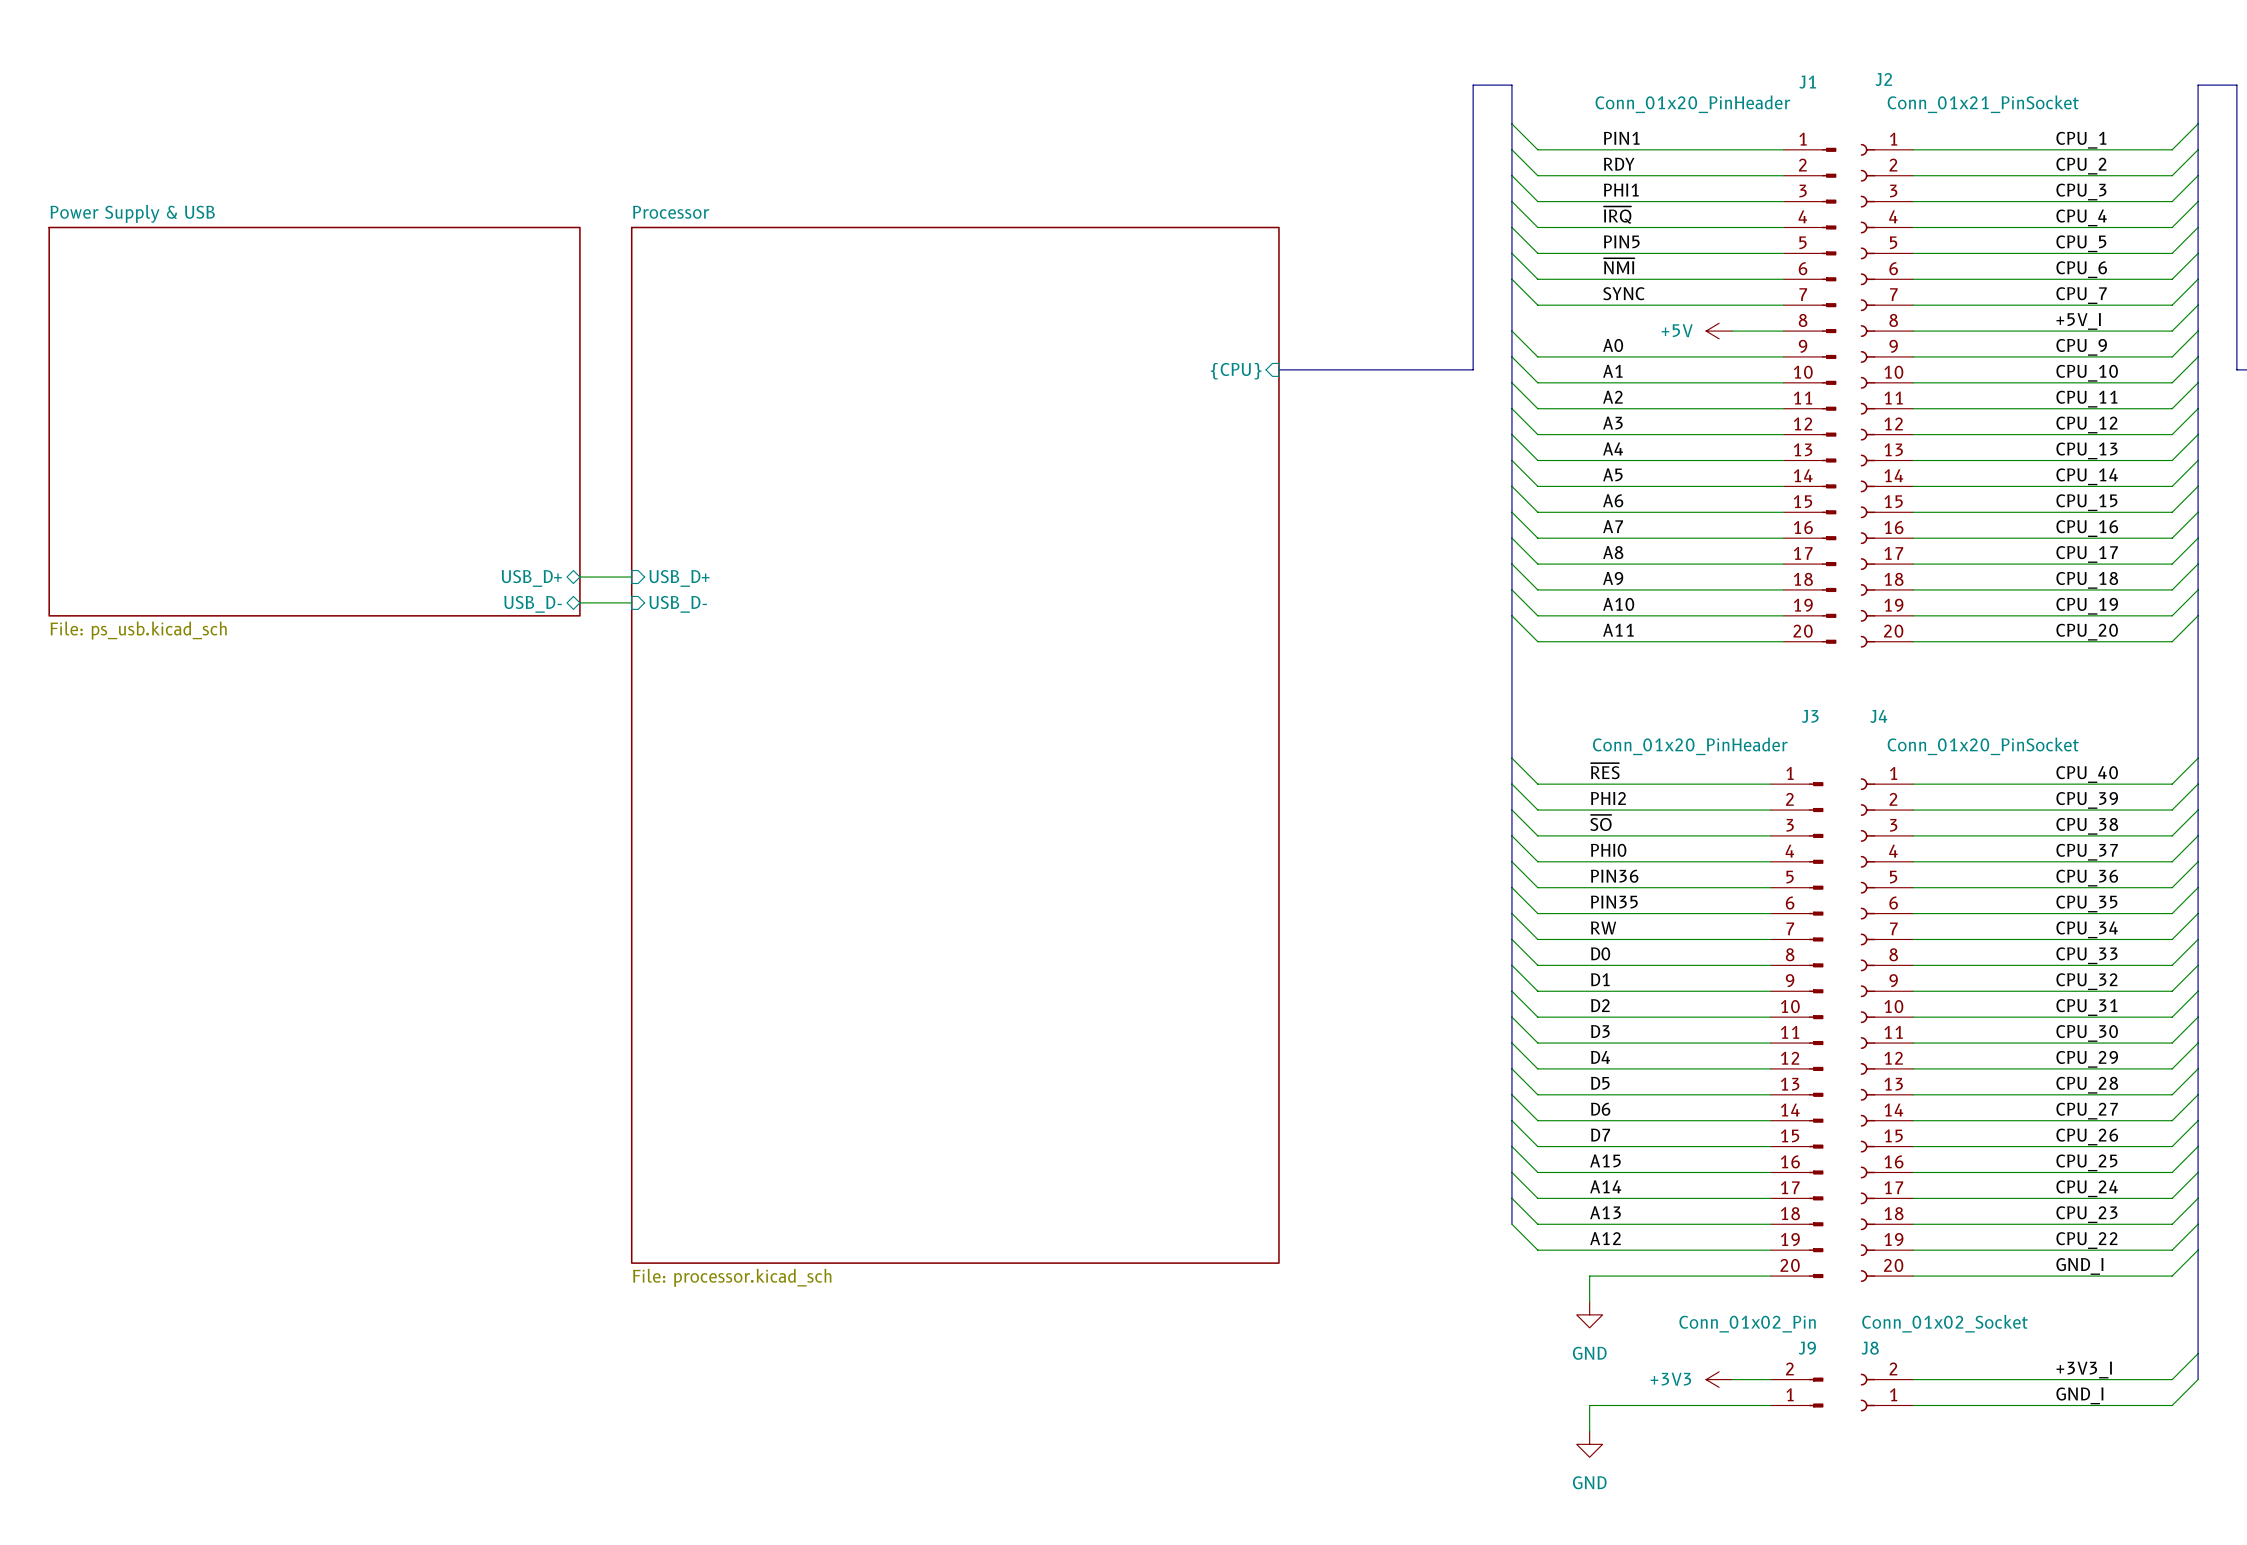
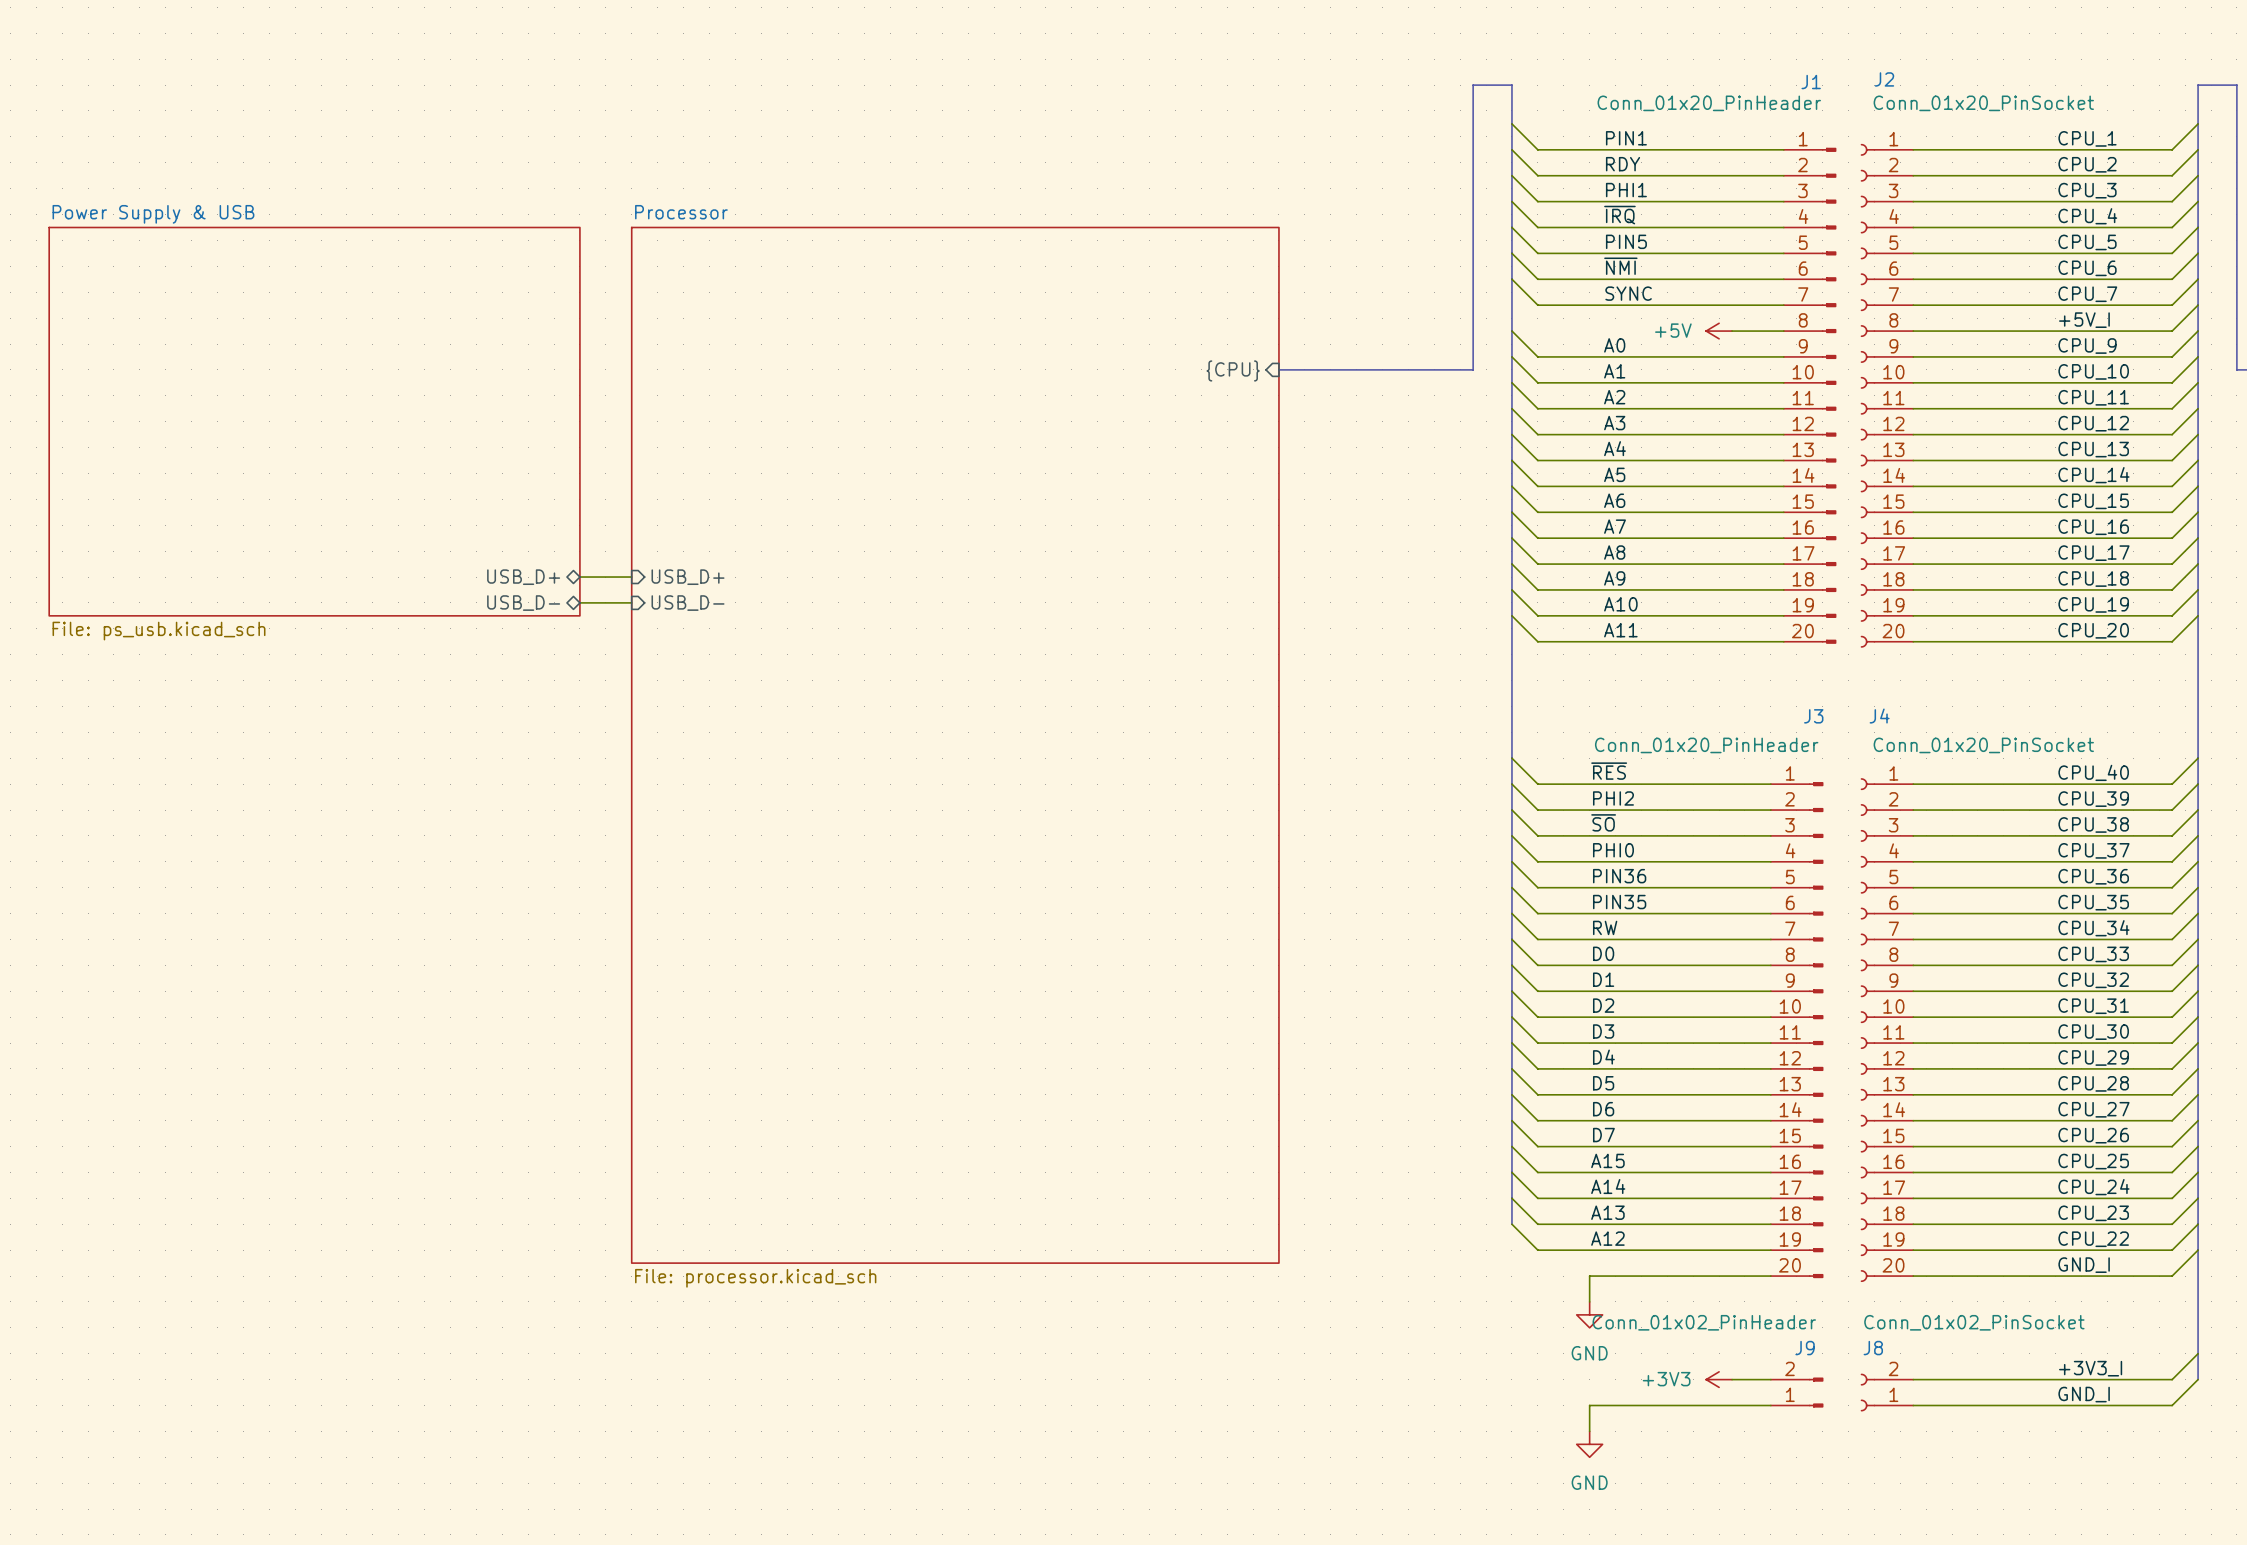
J2 value: Conn_01x21_PinSocket (1983, 104) -> Conn_01x20_PinSocket (1983, 103)
J8 value: Conn_01x02_Socket (1945, 1323) -> Conn_01x02_PinSocket (1974, 1322)
J9 value: Conn_01x02_Pin (1747, 1324) -> Conn_01x02_PinHeader (1704, 1322)

